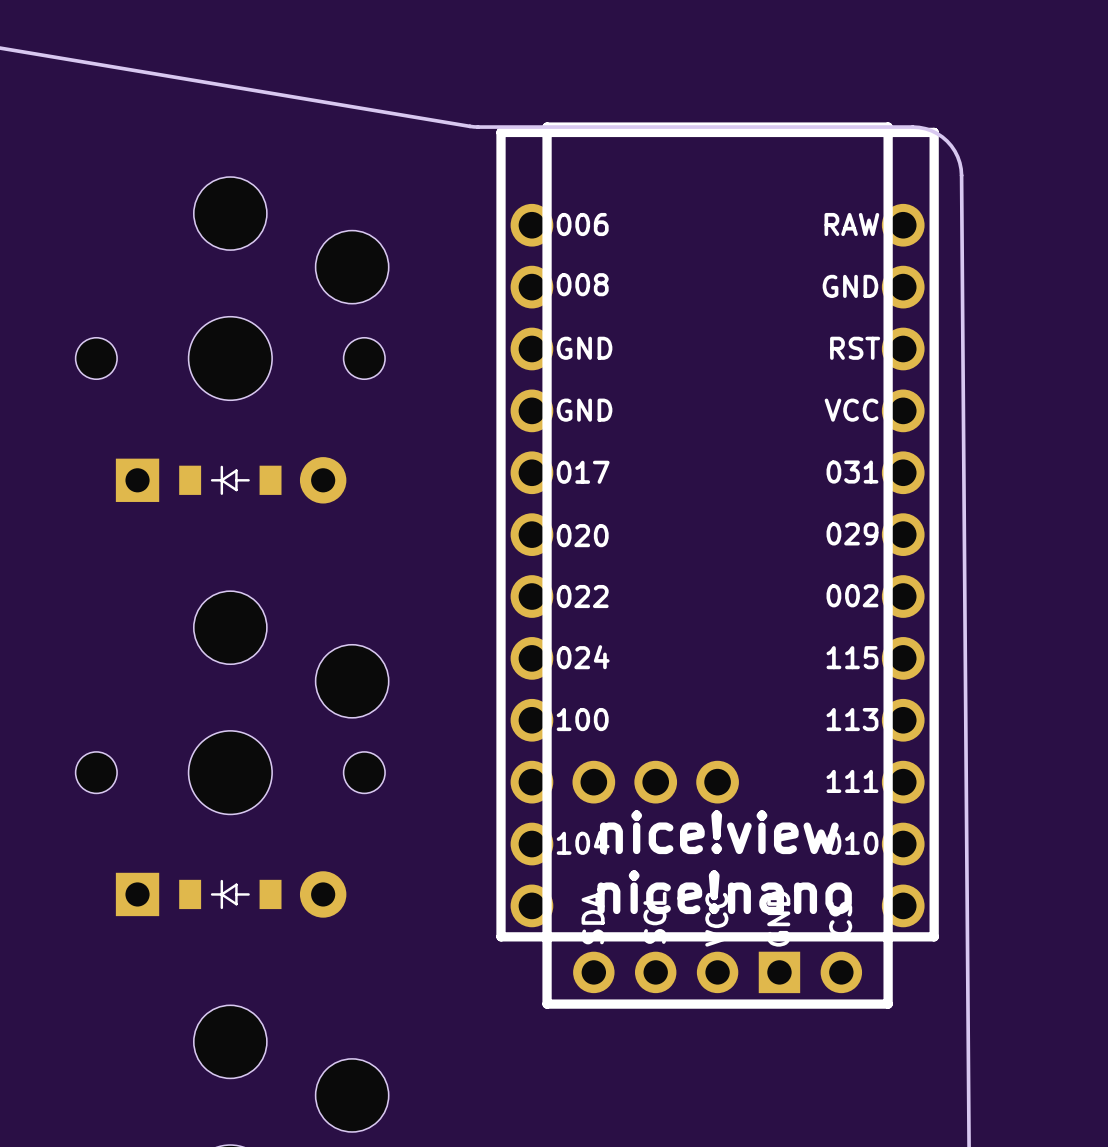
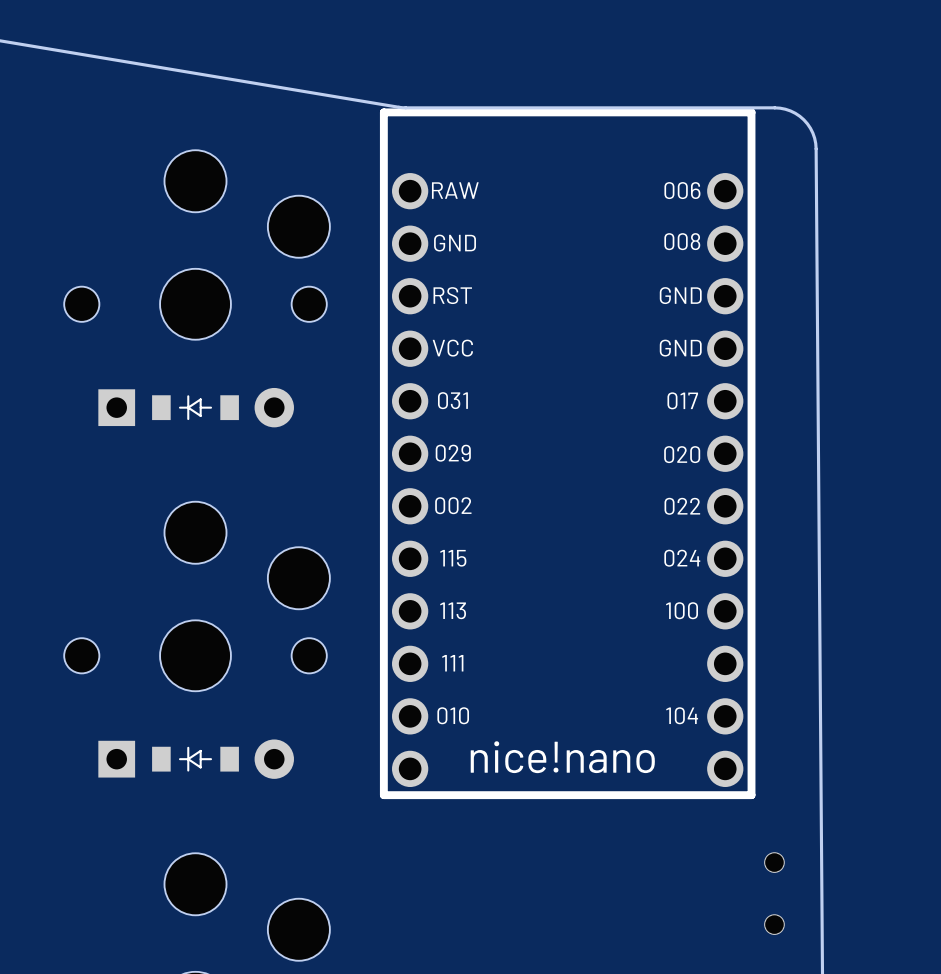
part: none -> (567, 453)
part: (717, 534) -> none
part: (717, 565) -> none
part: none -> (774, 893)

